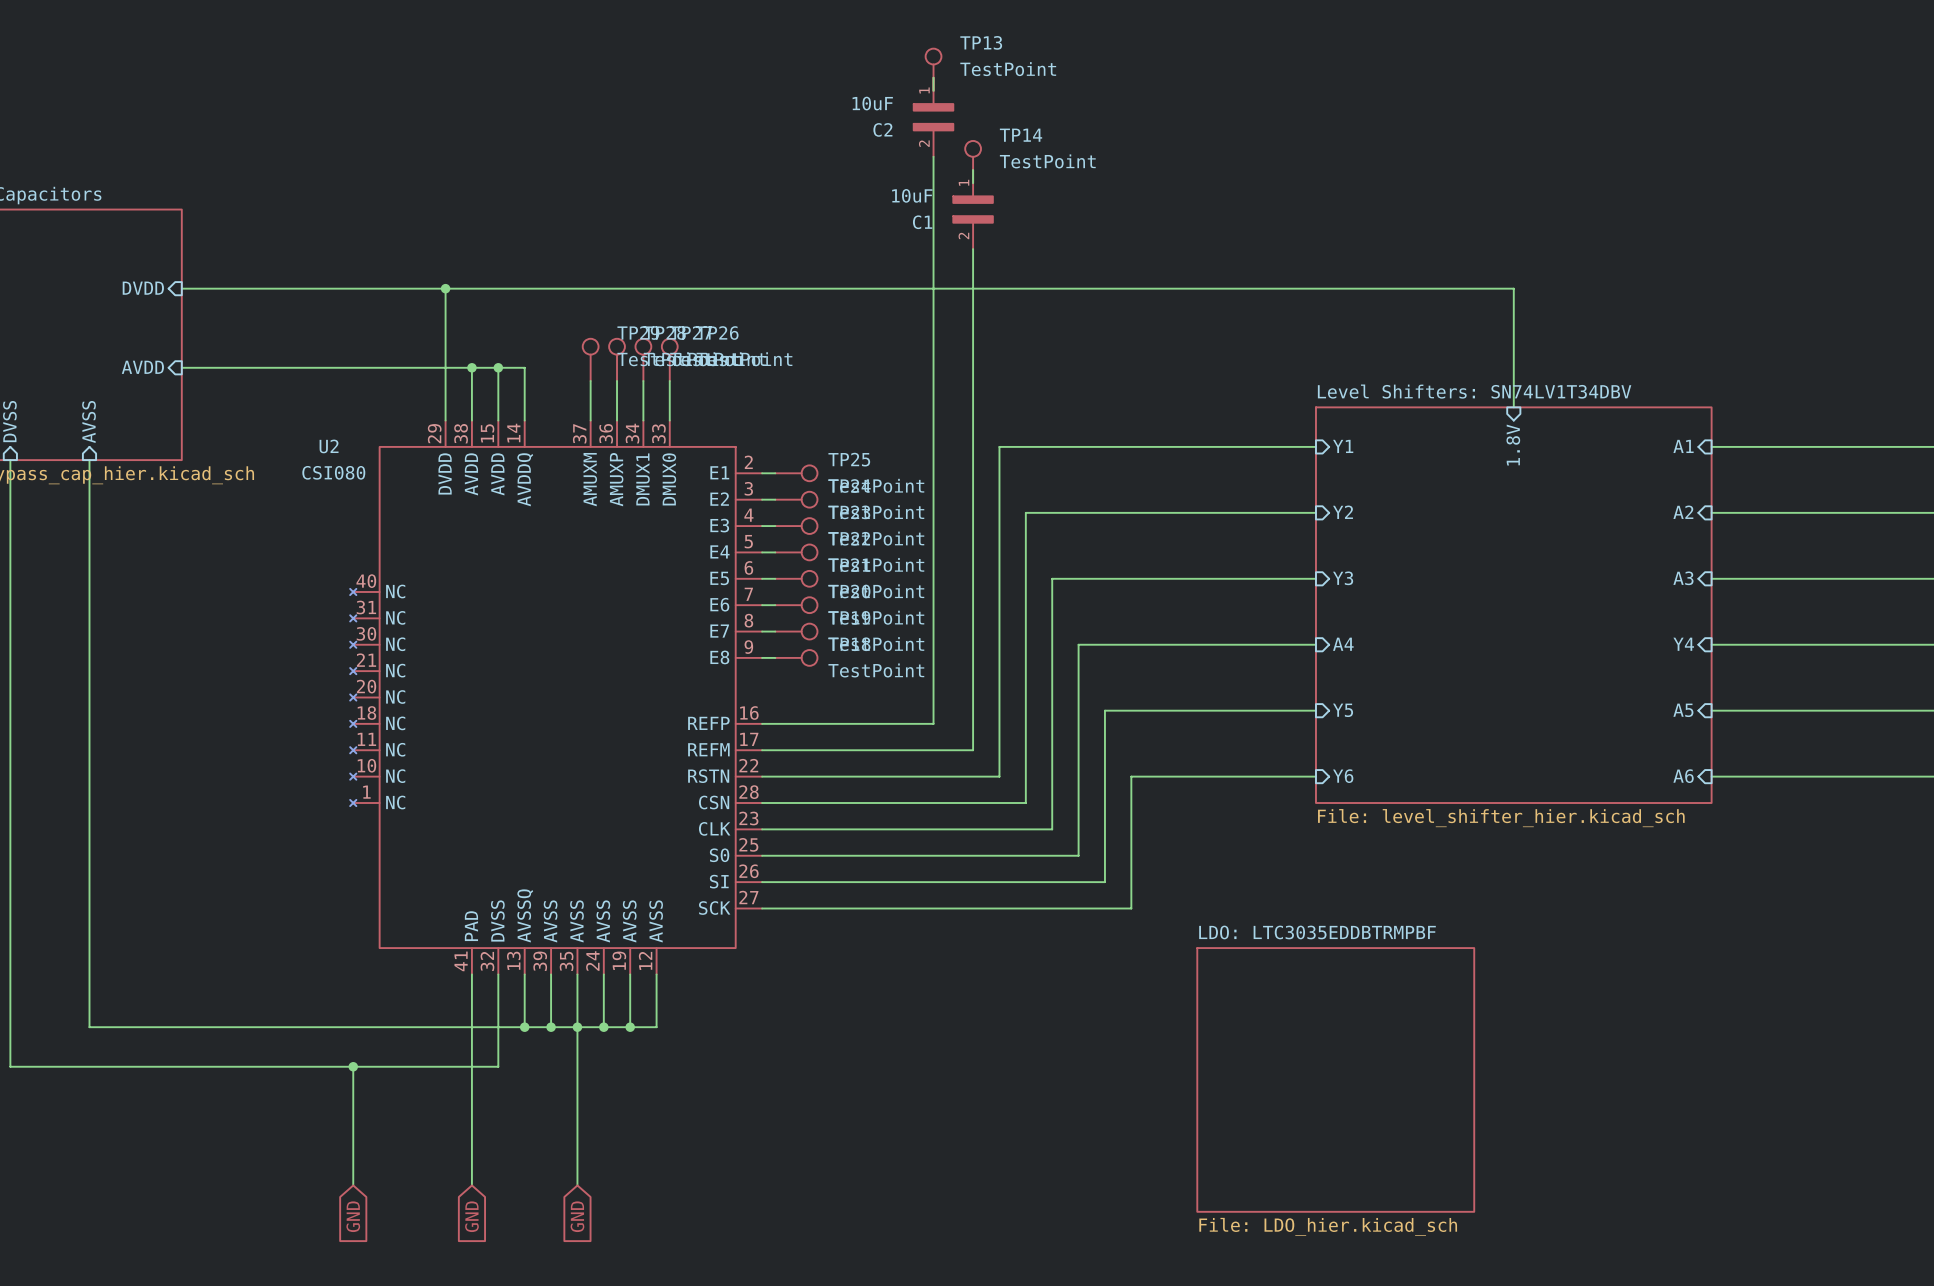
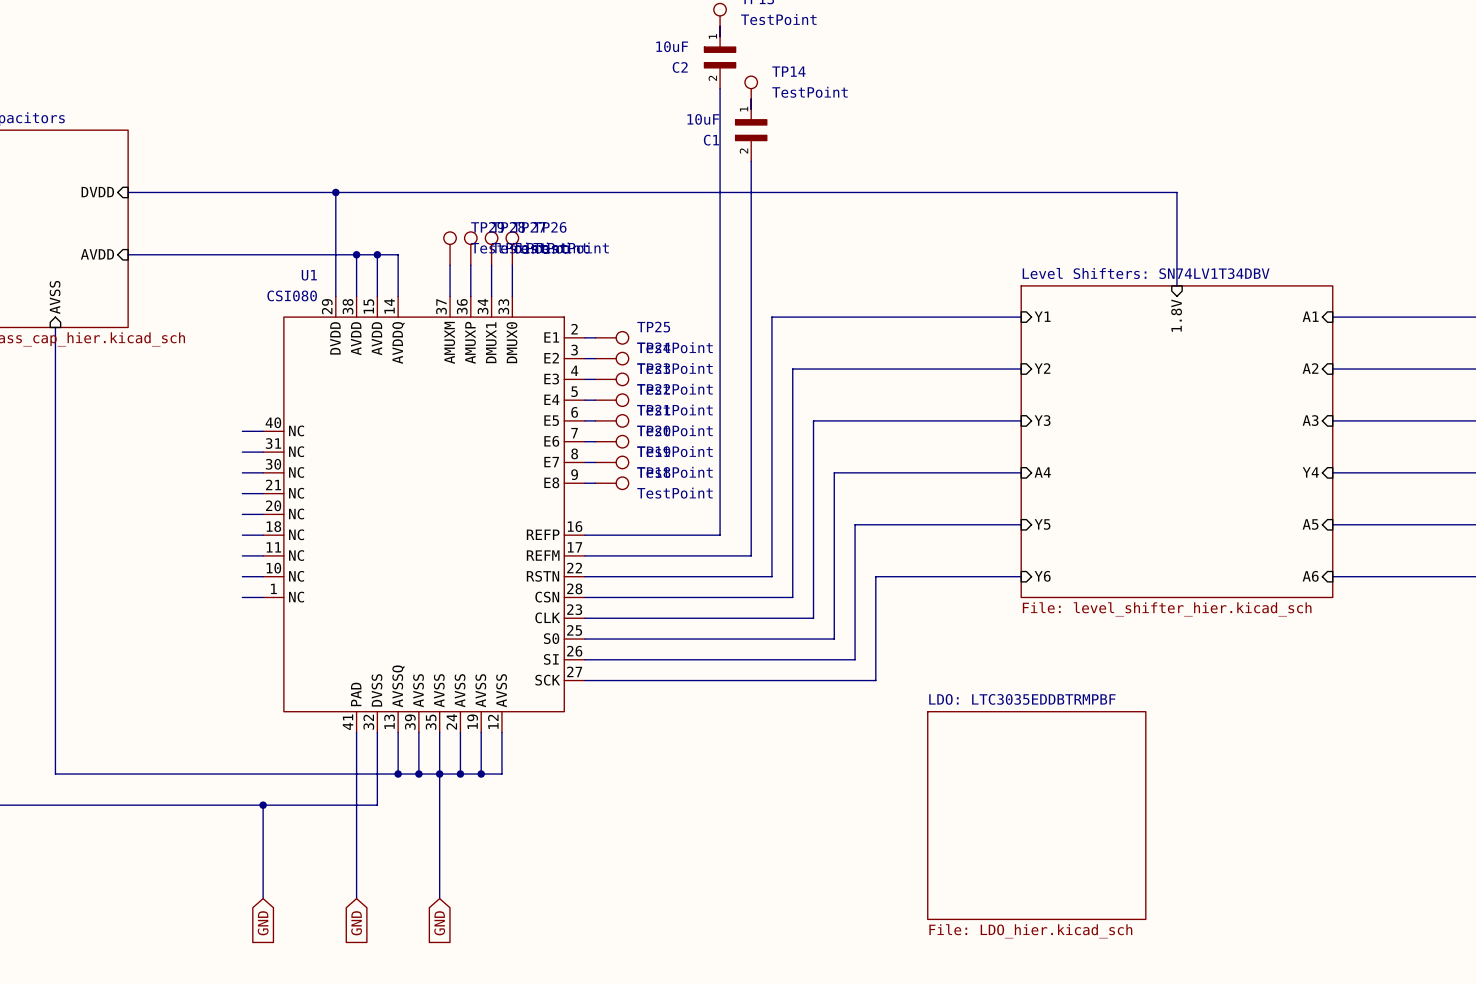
wire: none -> (242, 431) (263, 431)
wire: none -> (242, 452) (263, 452)
wire: none -> (242, 472) (263, 472)
wire: none -> (242, 493) (263, 493)
wire: none -> (242, 514) (263, 514)
U2: CSI080 (556, 697) -> none
U1: none -> CSI080 (424, 514)
wire: none -> (242, 535) (263, 535)
wire: none -> (242, 555) (263, 555)
wire: none -> (242, 576) (263, 576)
wire: none -> (242, 597) (263, 597)

